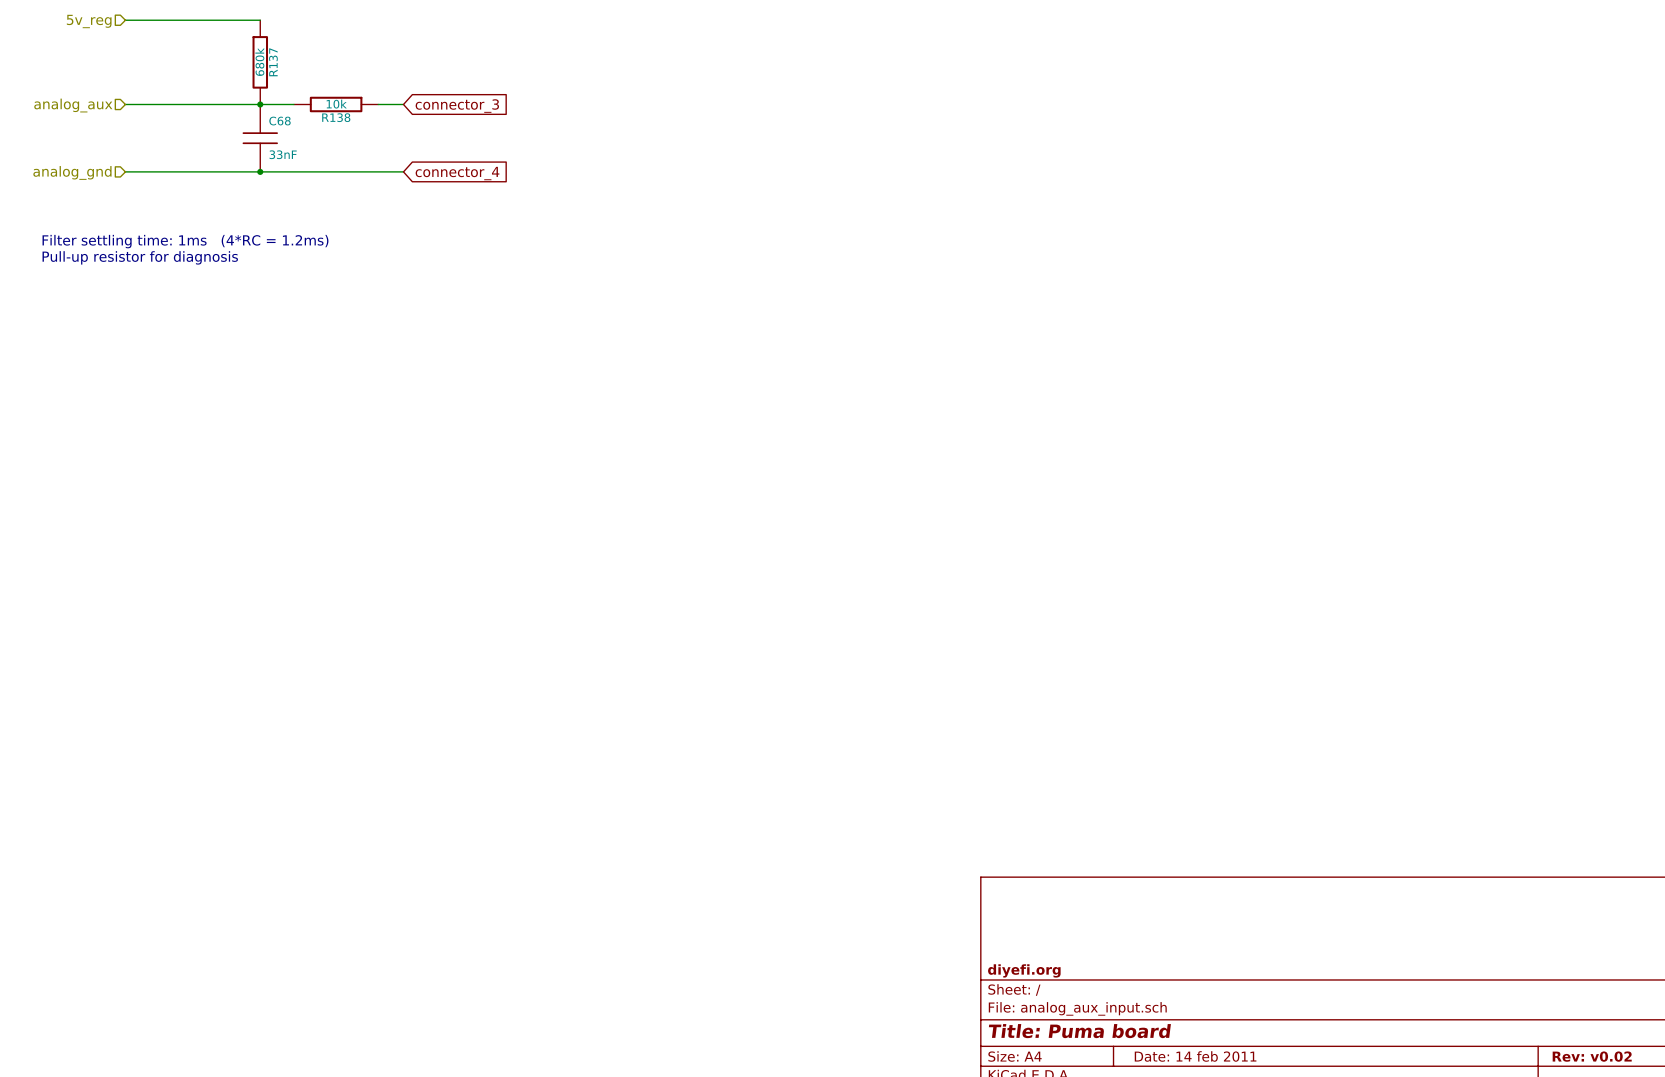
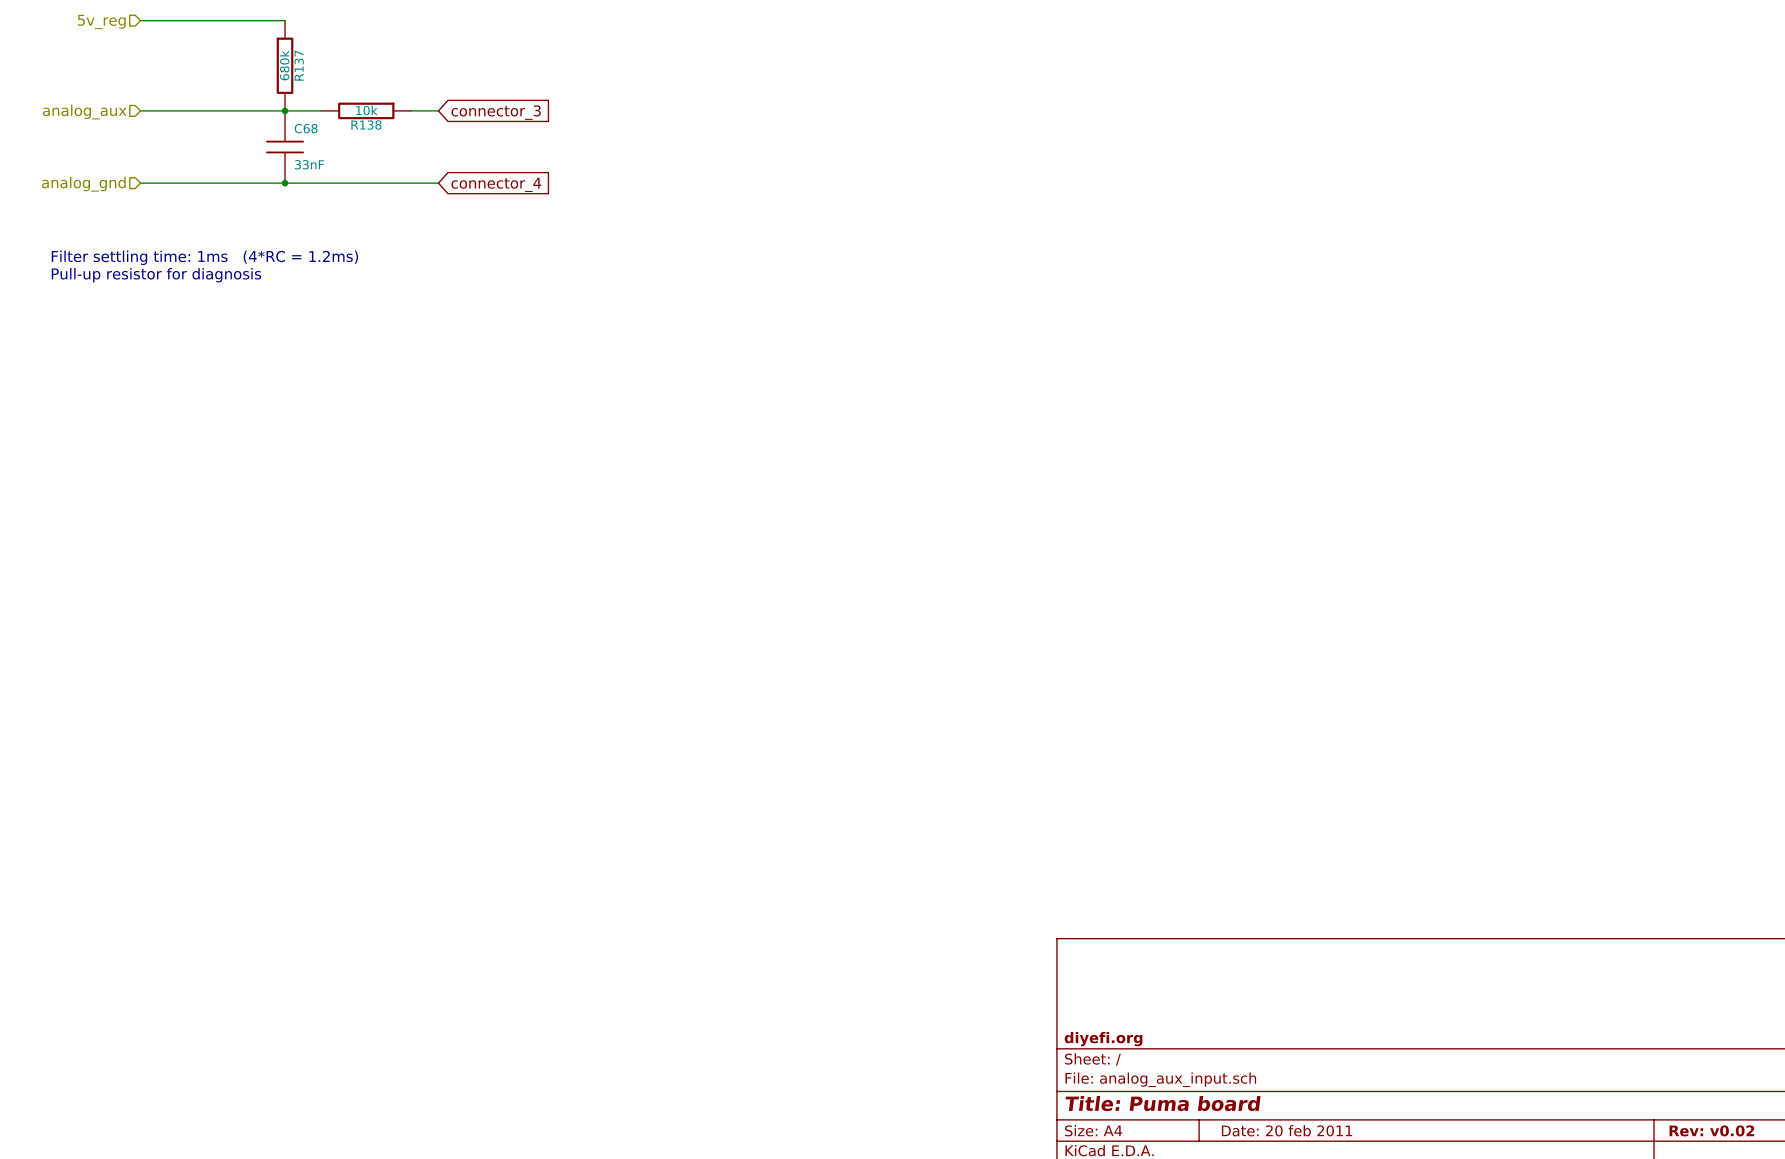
title block: Date: 14 feb 2011 (1195, 1056) -> Date: 20 feb 2011 (1287, 1130)

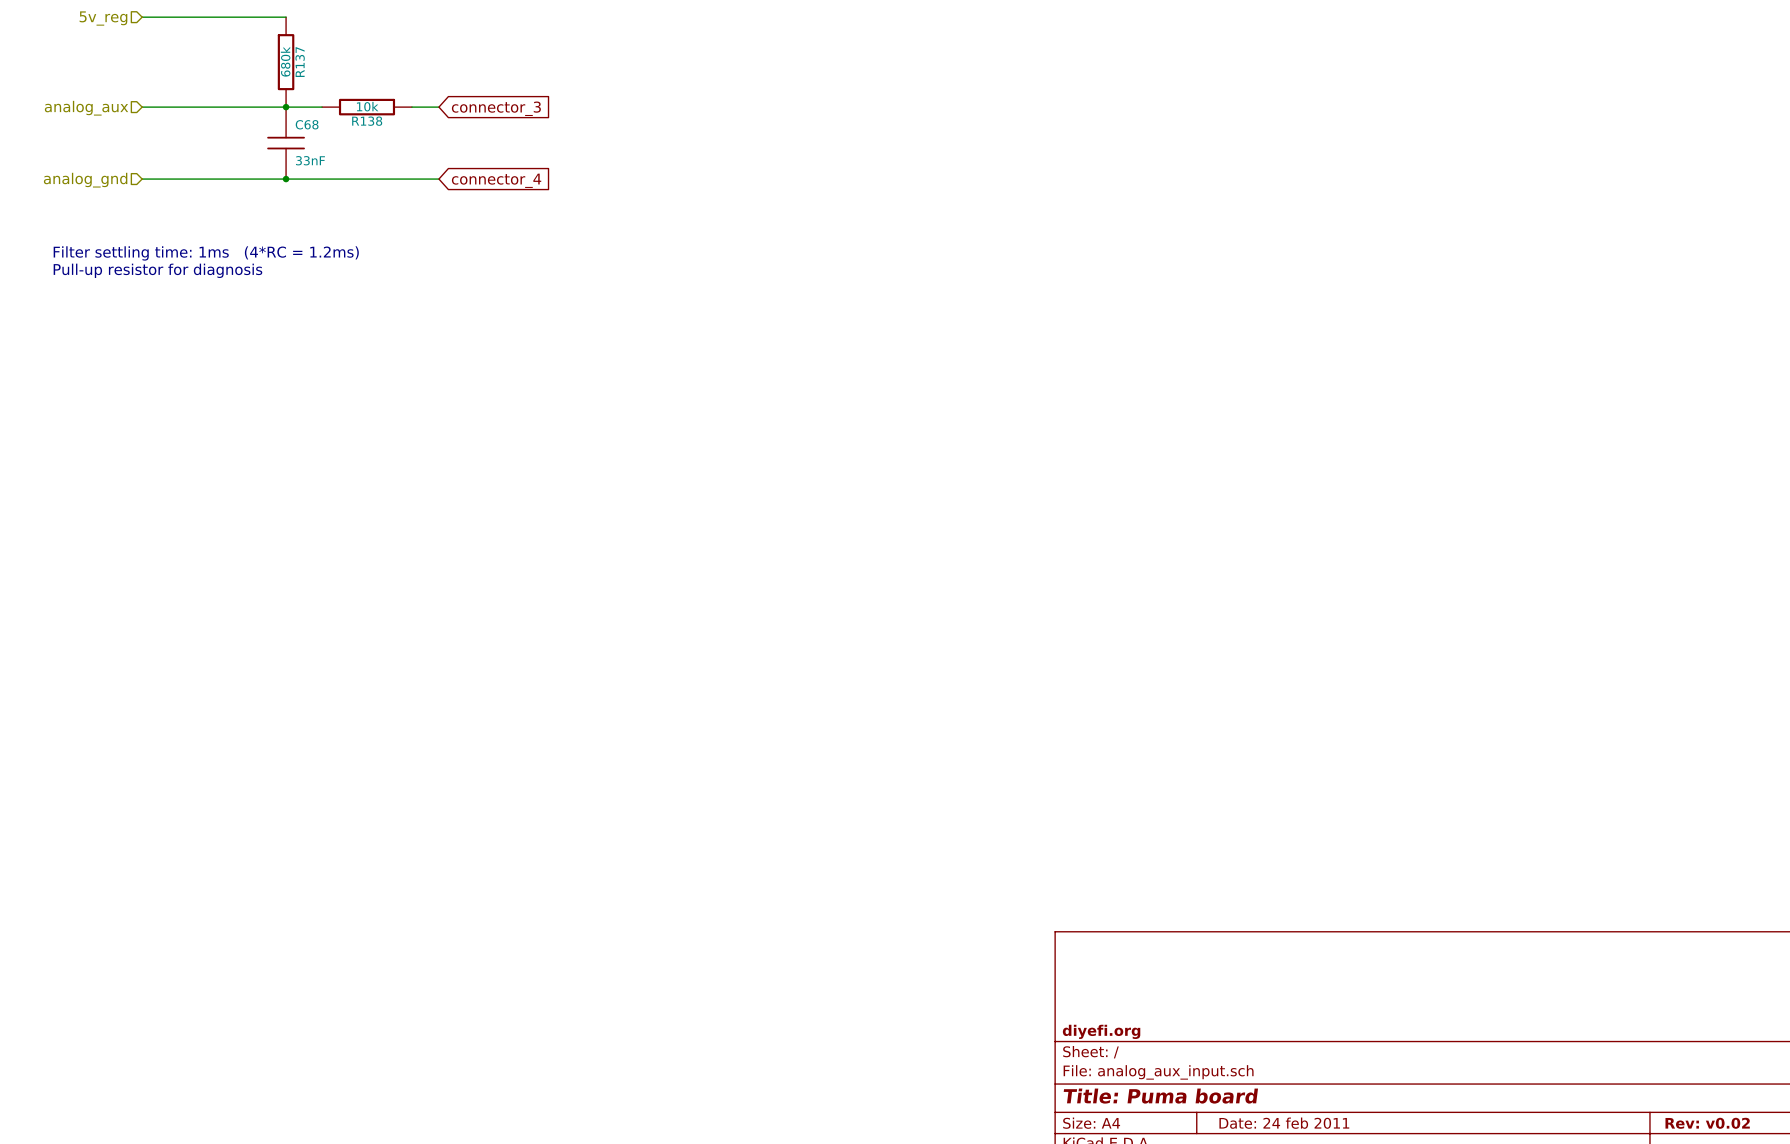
title block: Date: 20 feb 2011 (1287, 1130) -> Date: 24 feb 2011 (1284, 1123)

